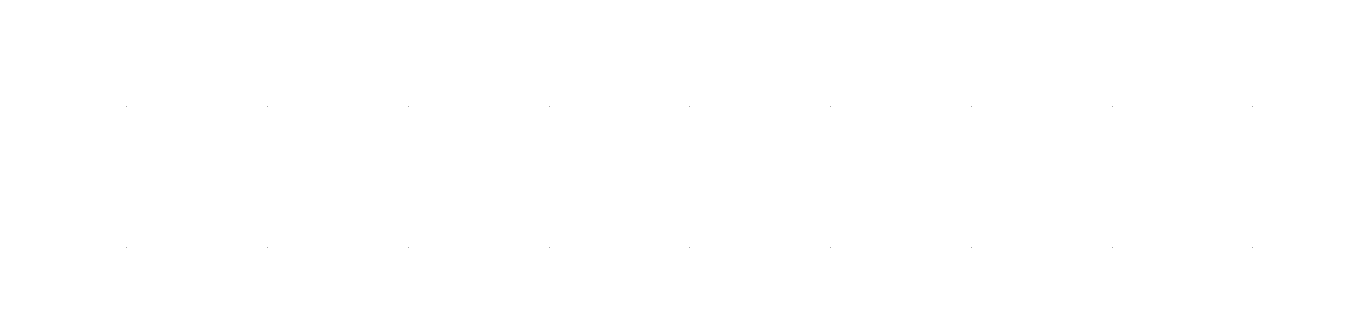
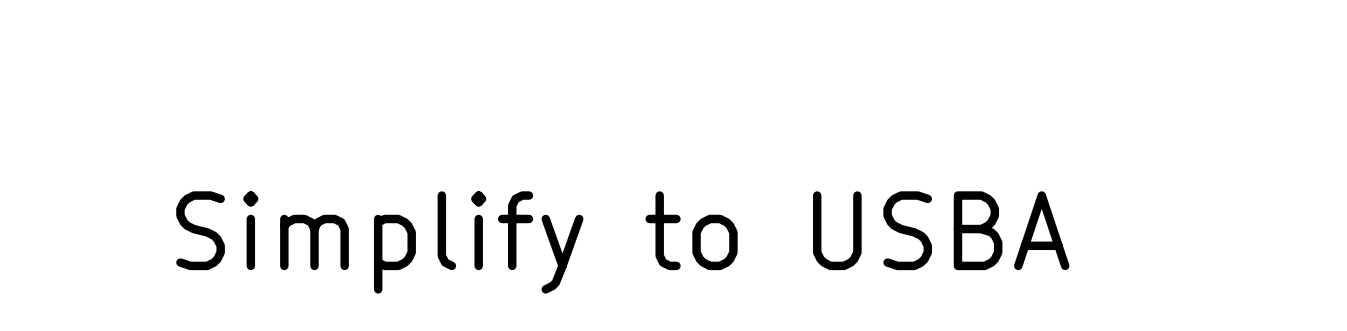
text: none -> Simplify to USBA (622, 242)

